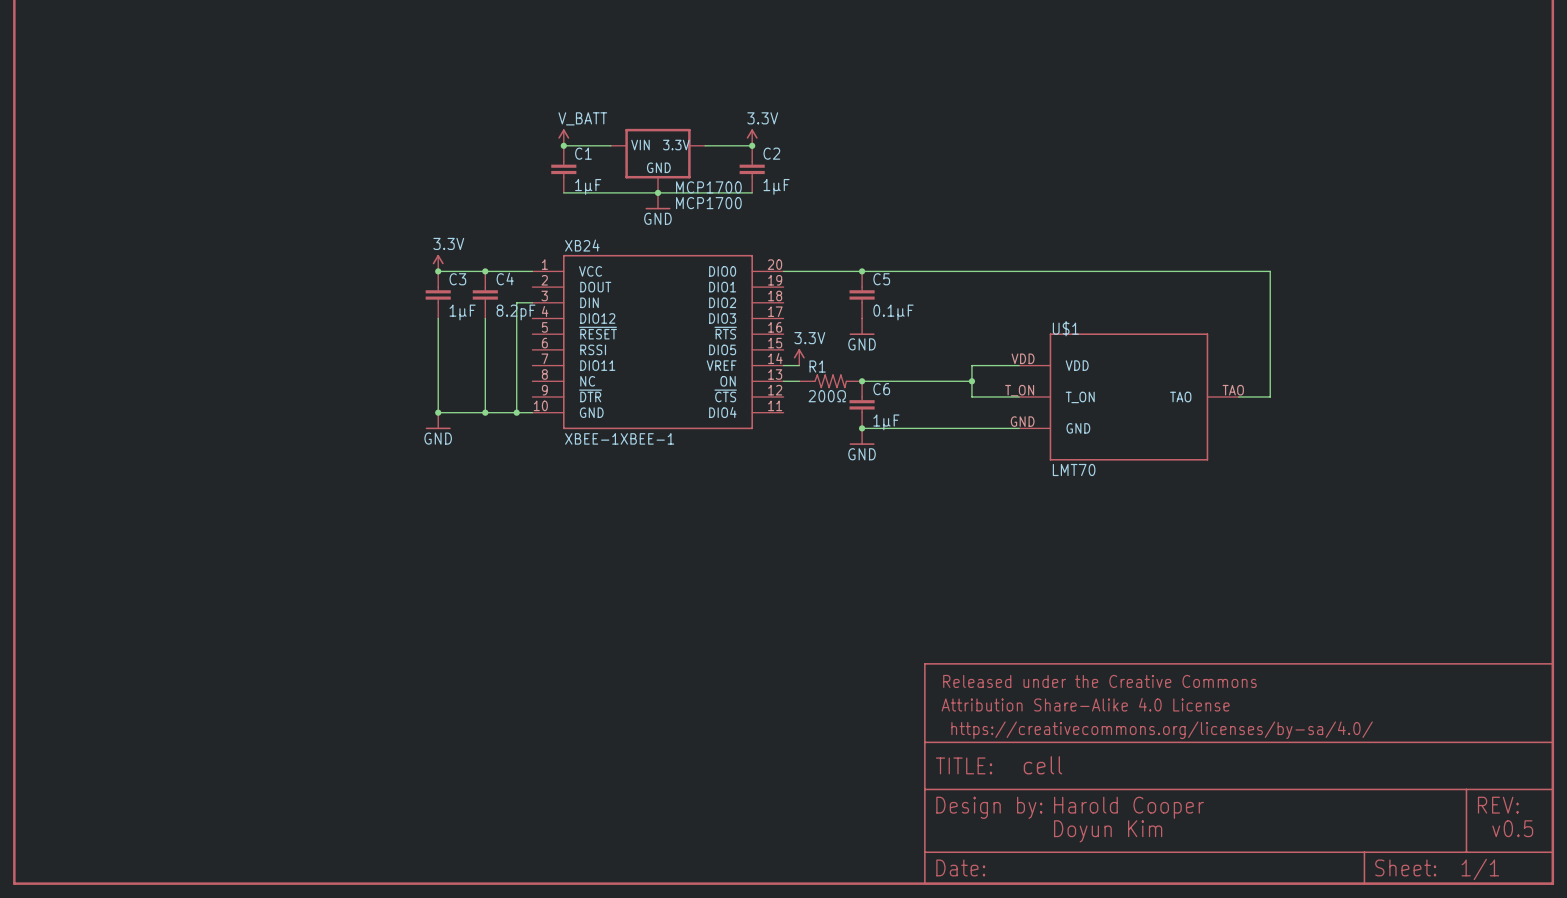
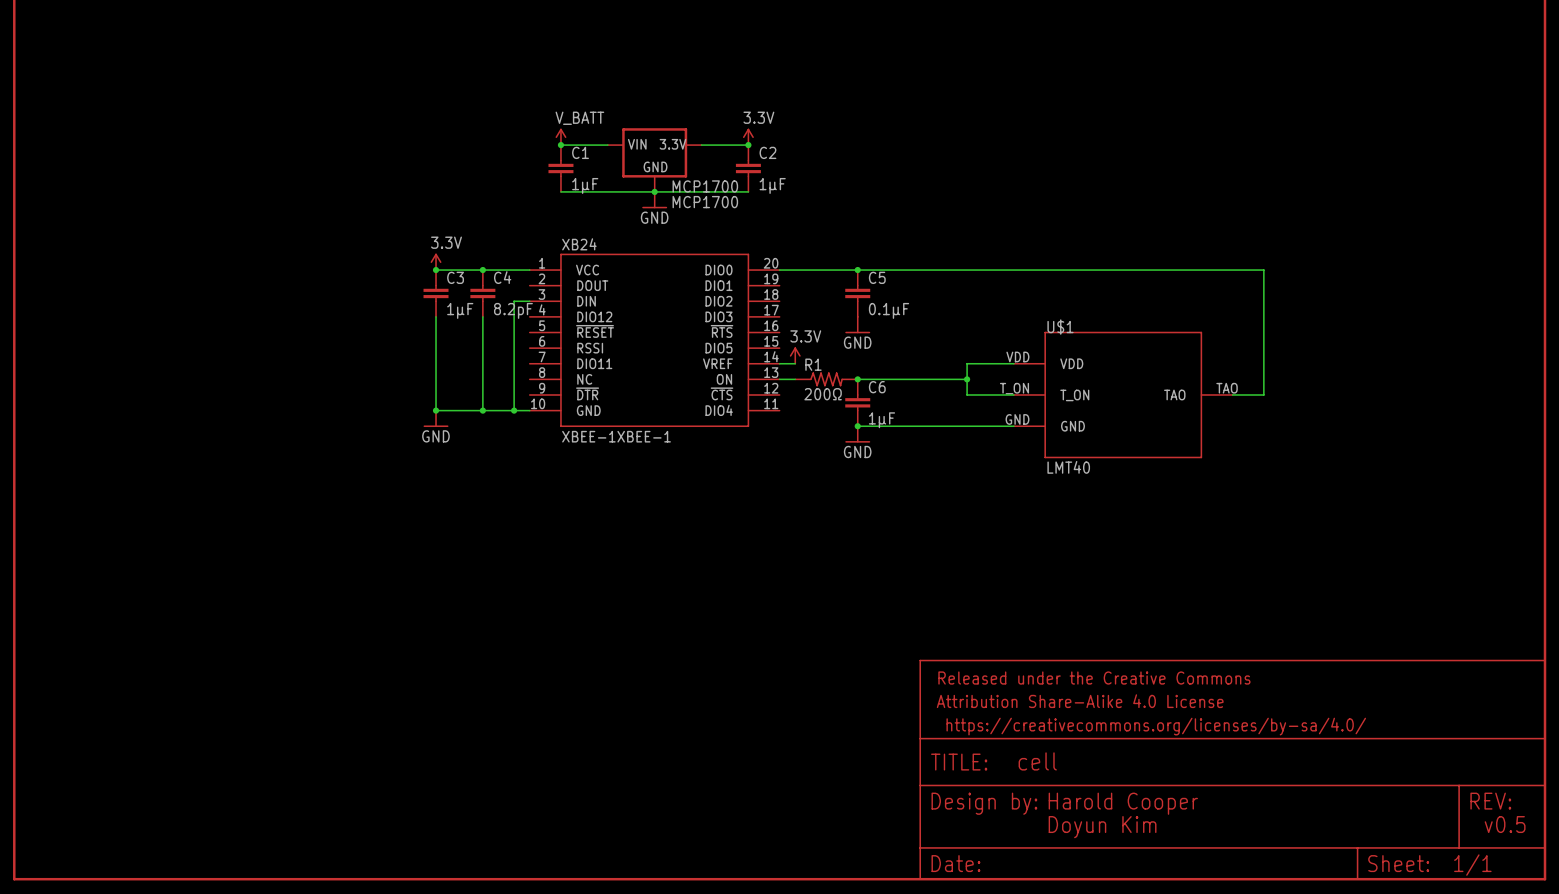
U$1 value: LMT70 (1074, 469) -> LMT40 (1068, 467)

